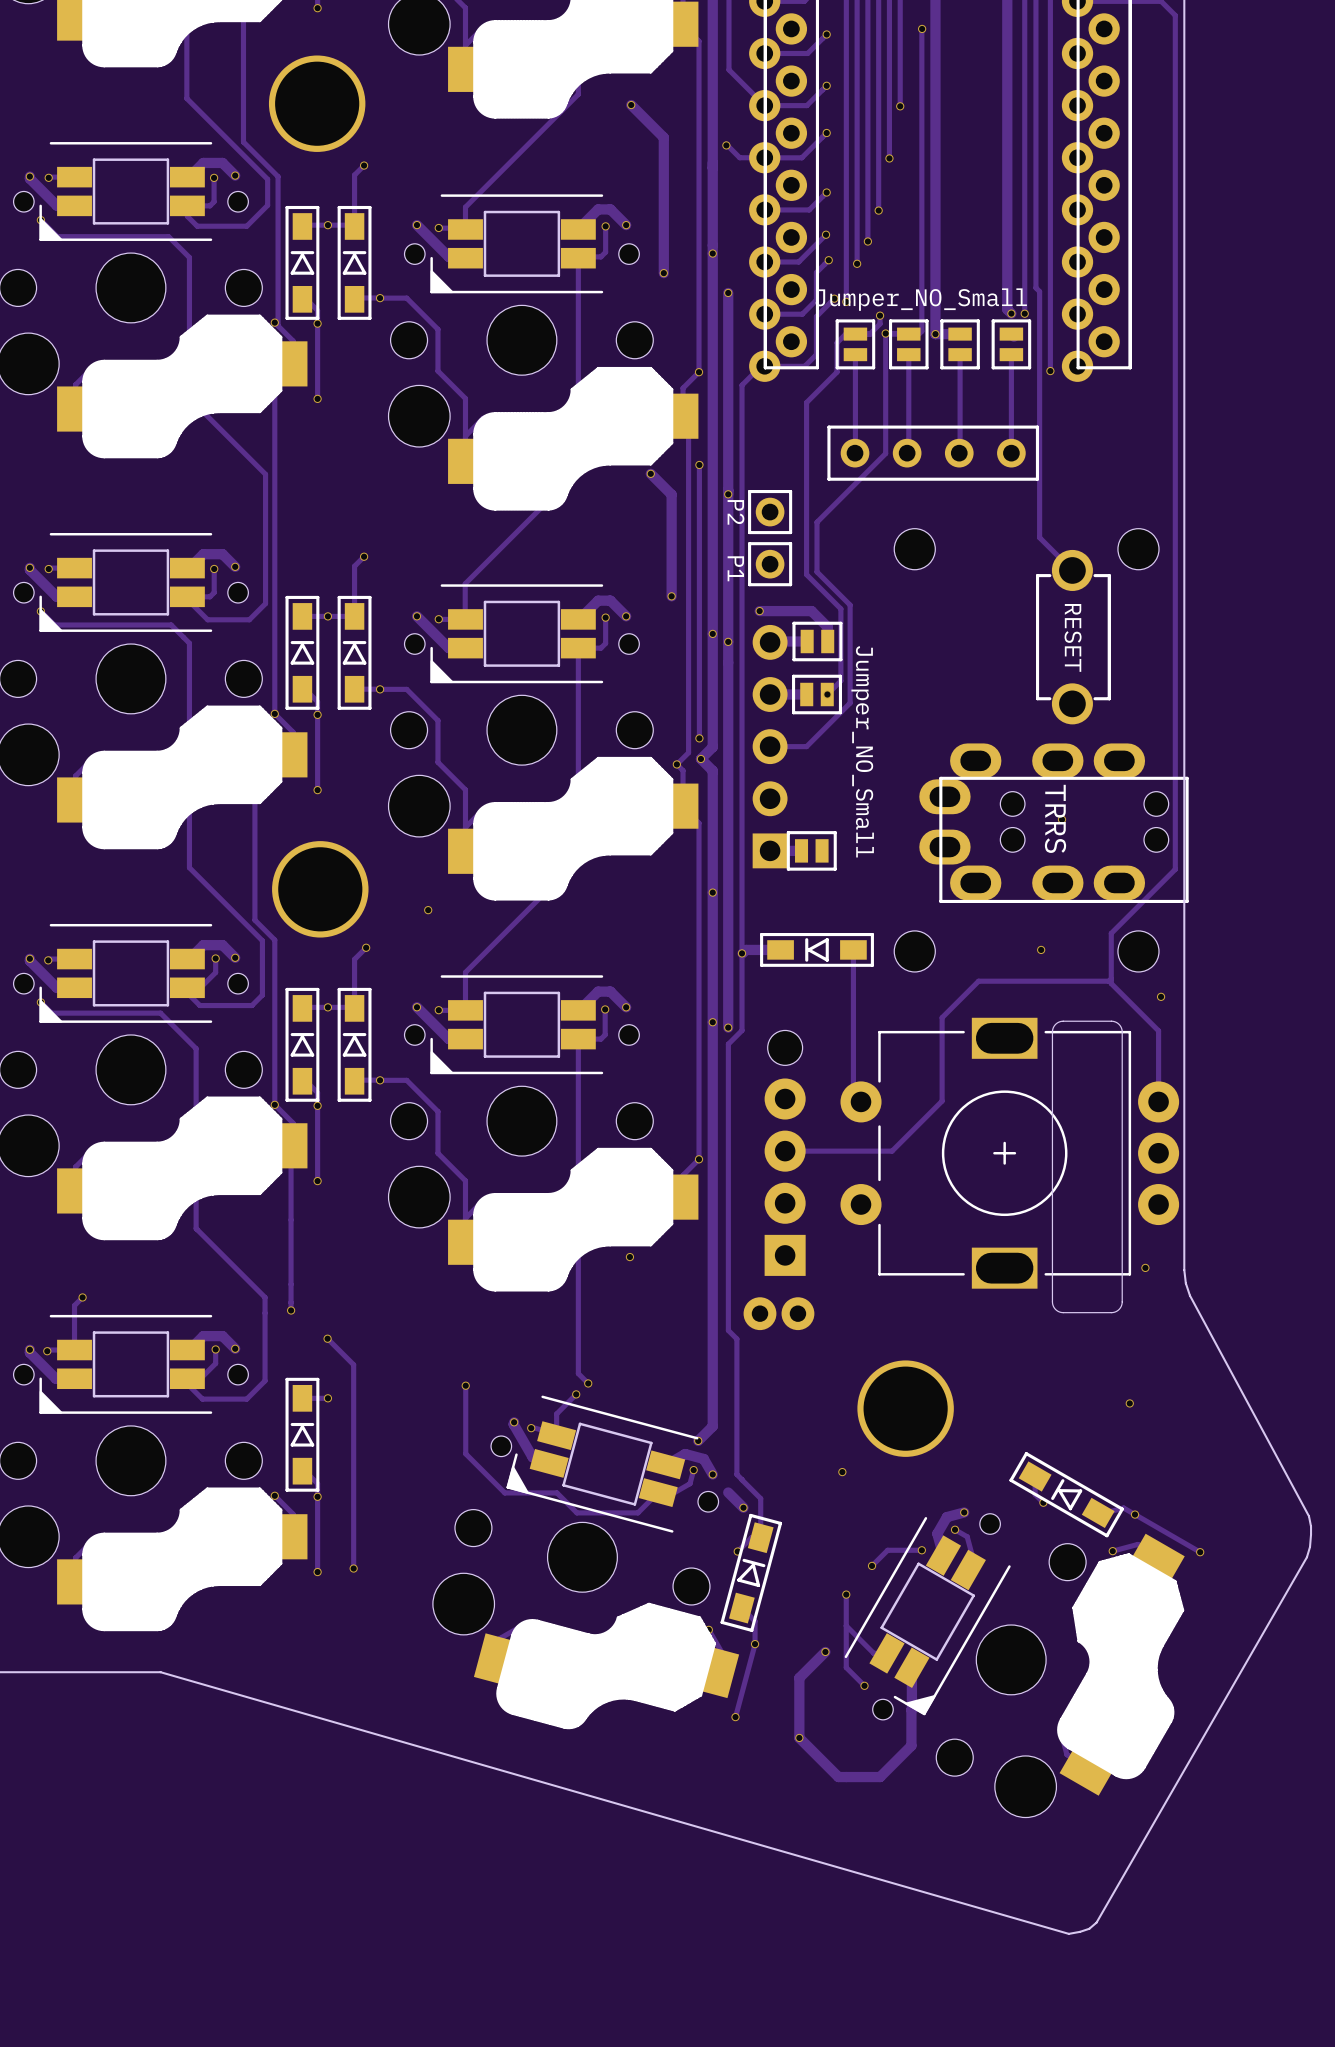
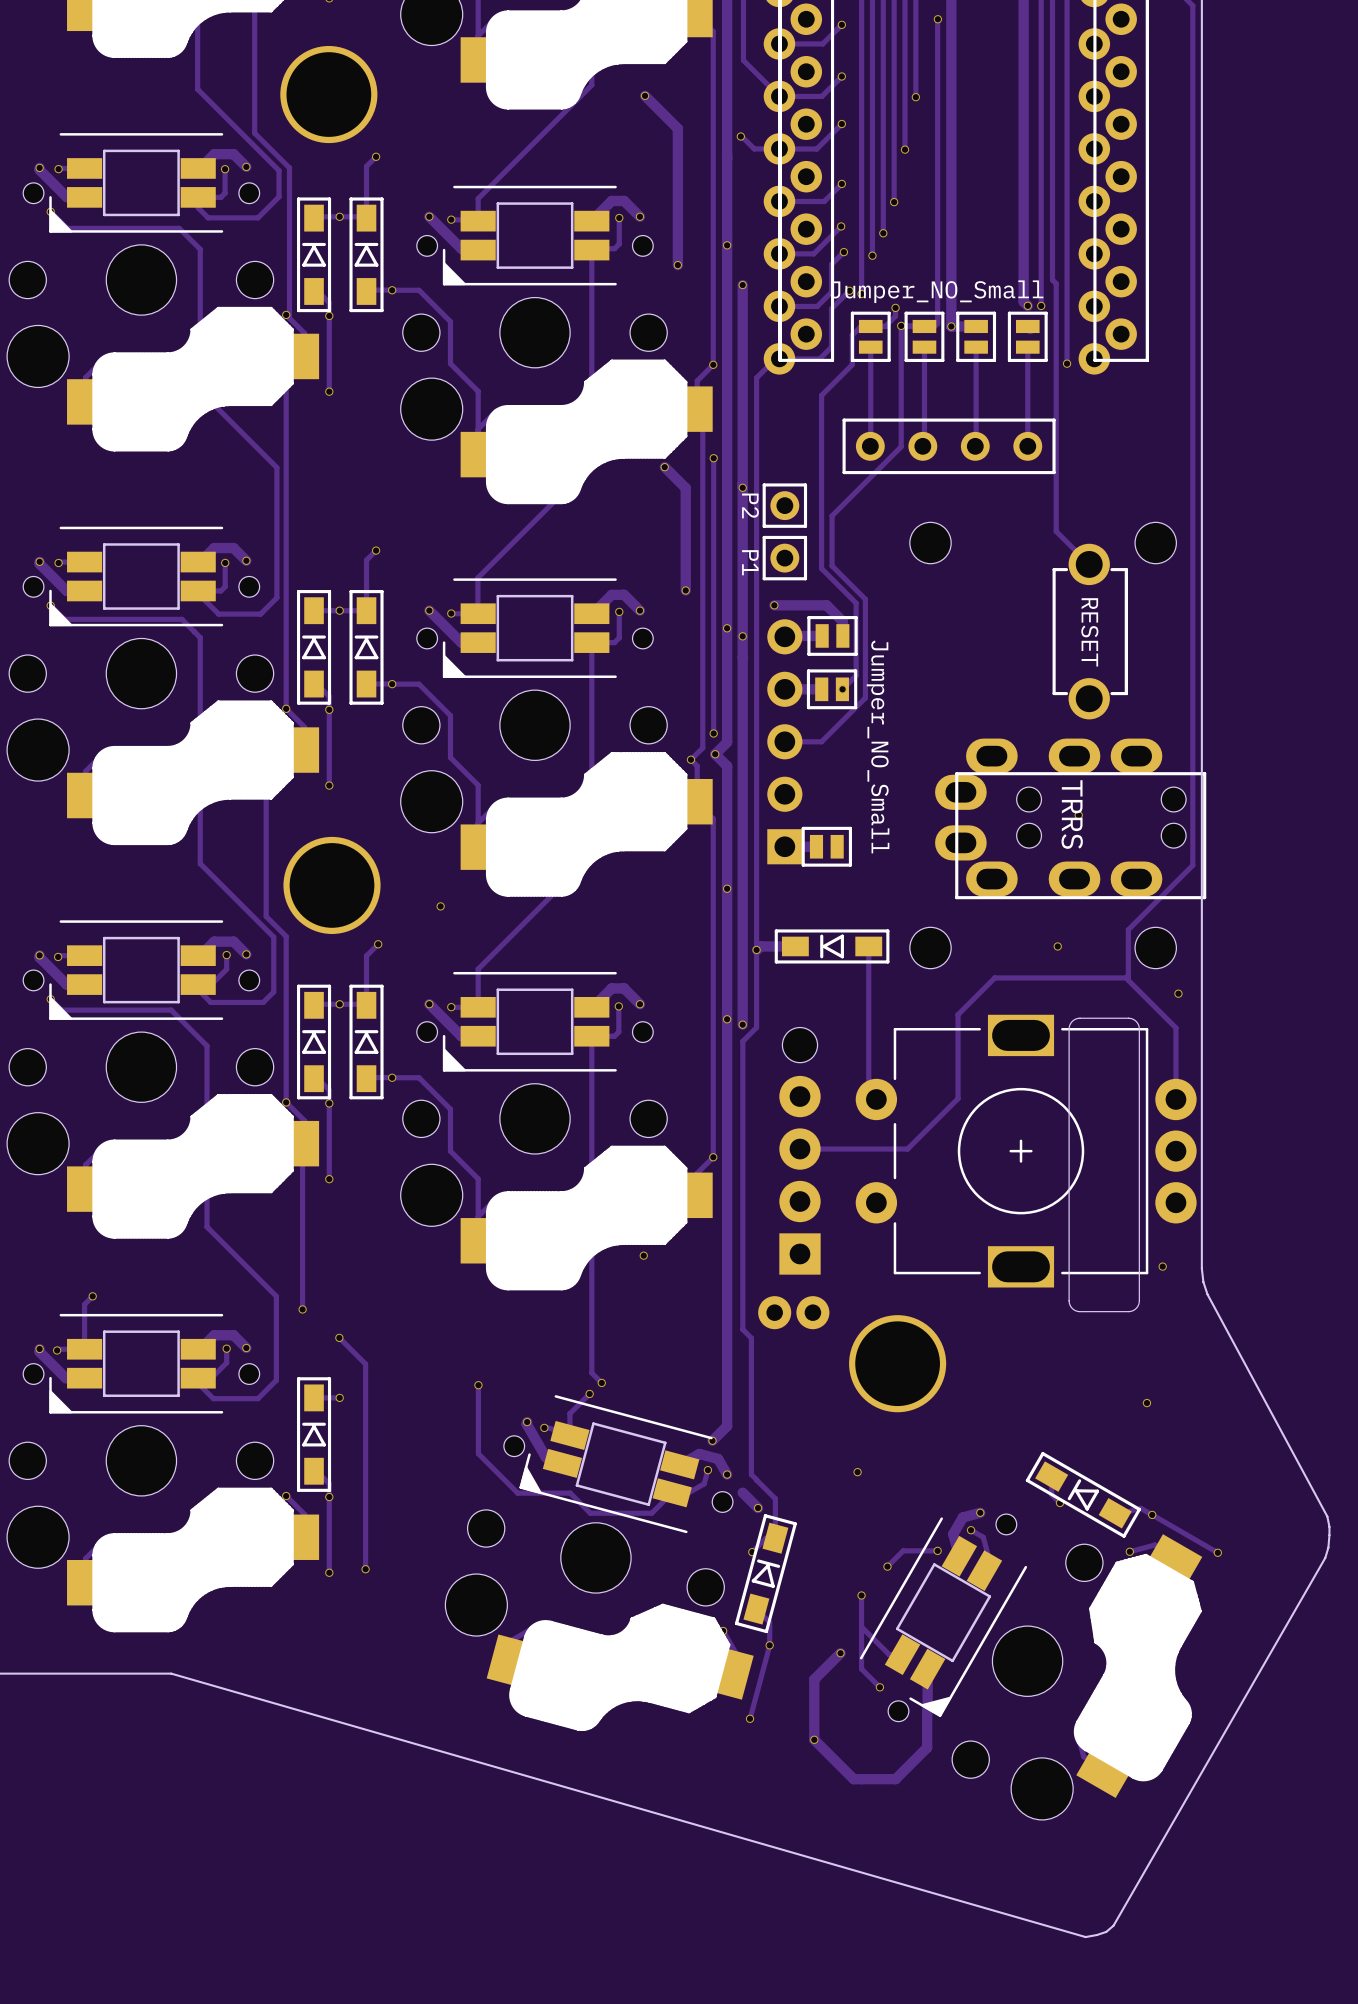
part position: (905, 1408) -> (897, 1363)

